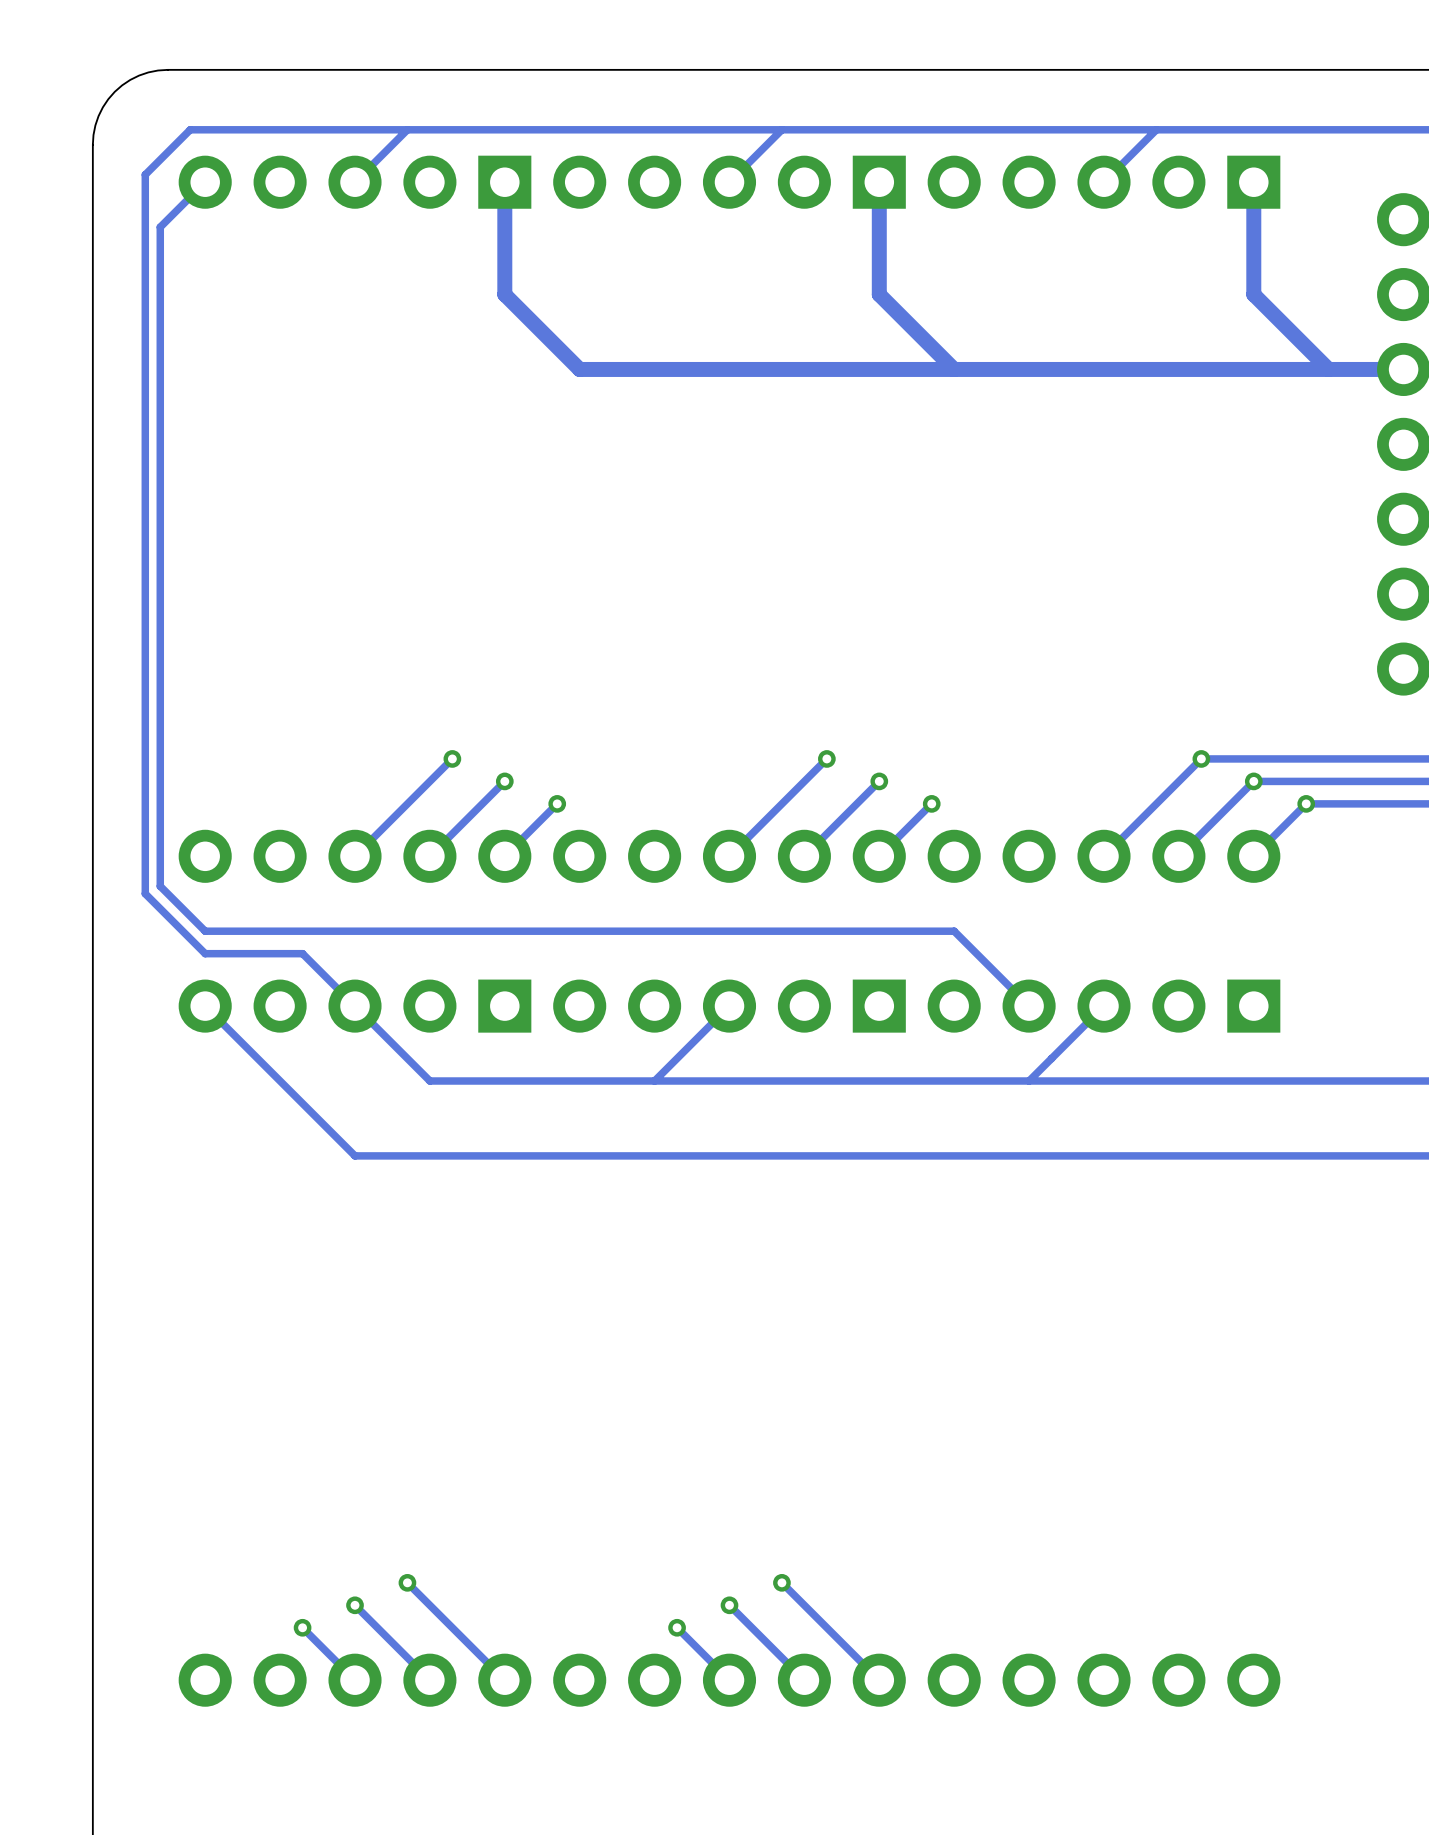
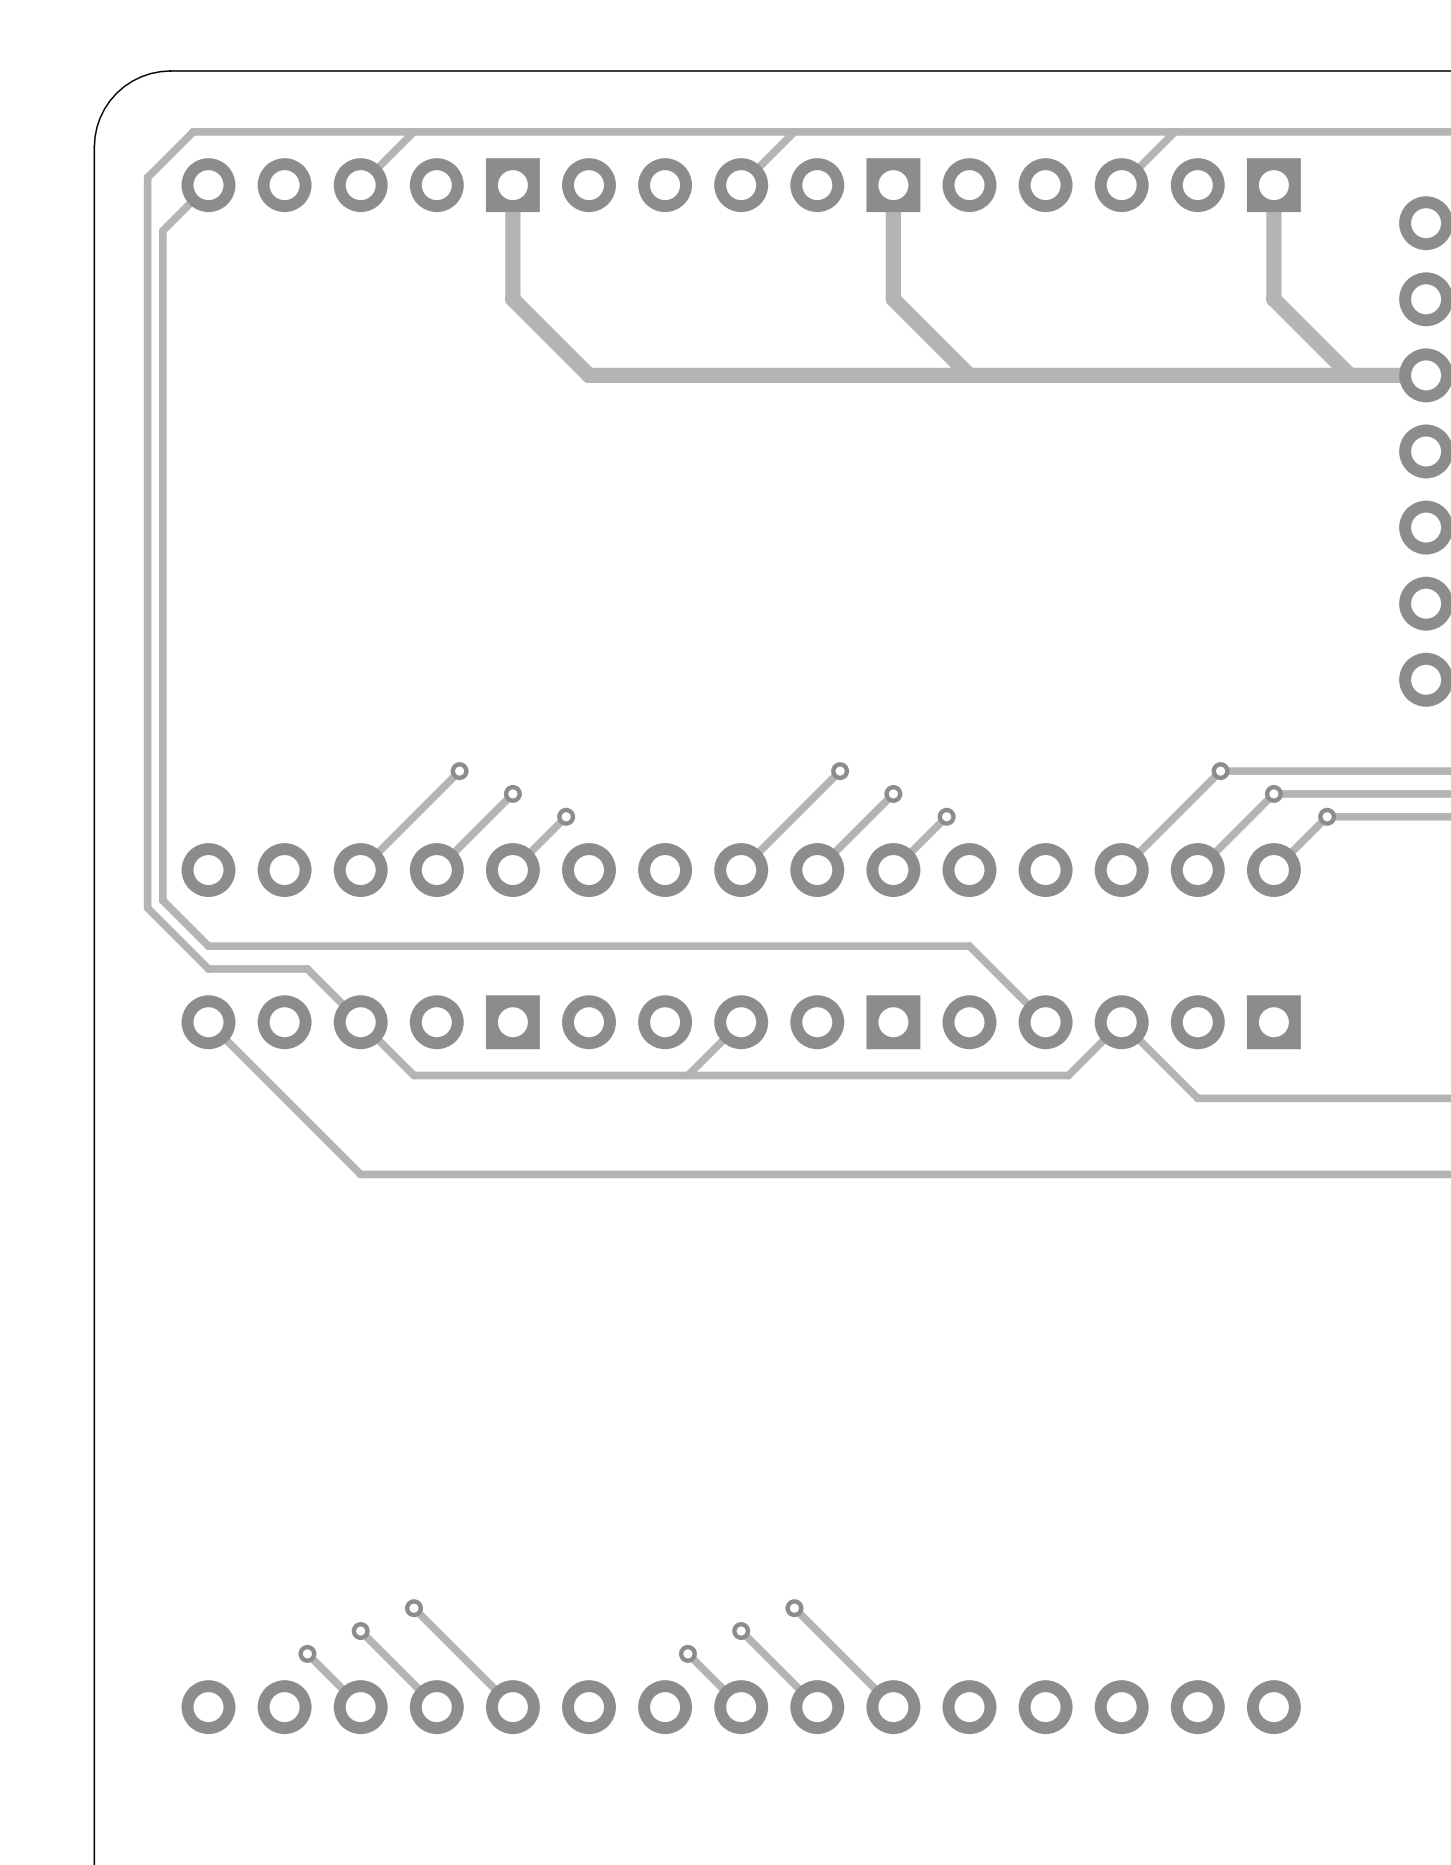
track: none -> (1121, 1022) (1197, 1098)
track: (407, 1058) (429, 1081) (1178, 1081) -> (413, 1075) (1068, 1075)
track: (677, 1058) (654, 1081) -> none
track: (1051, 1058) (1029, 1081) -> none

